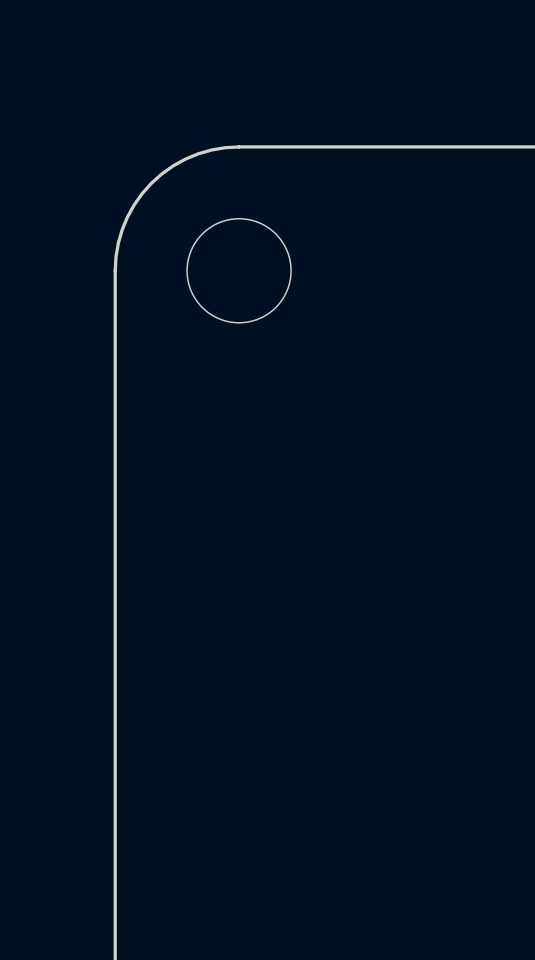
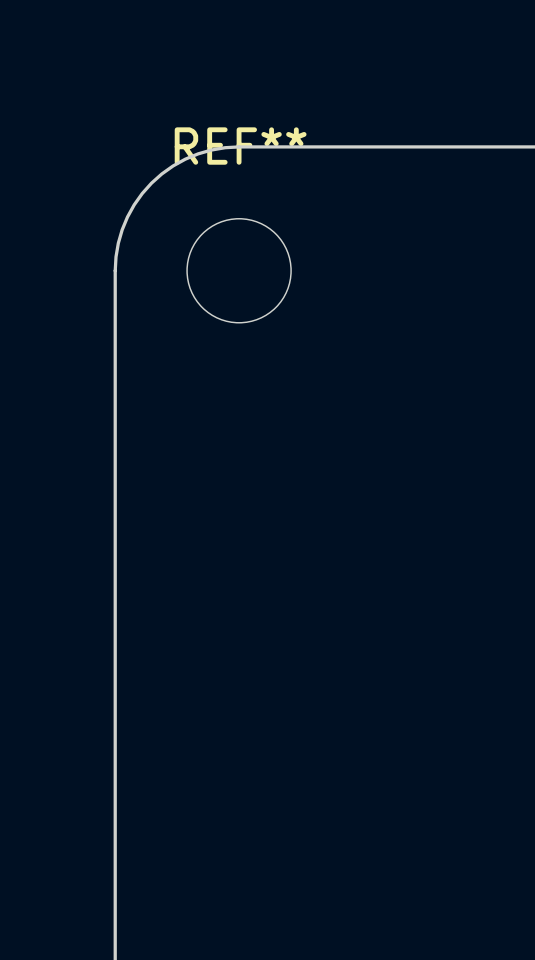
REF** name: none -> REF** (240, 146)

